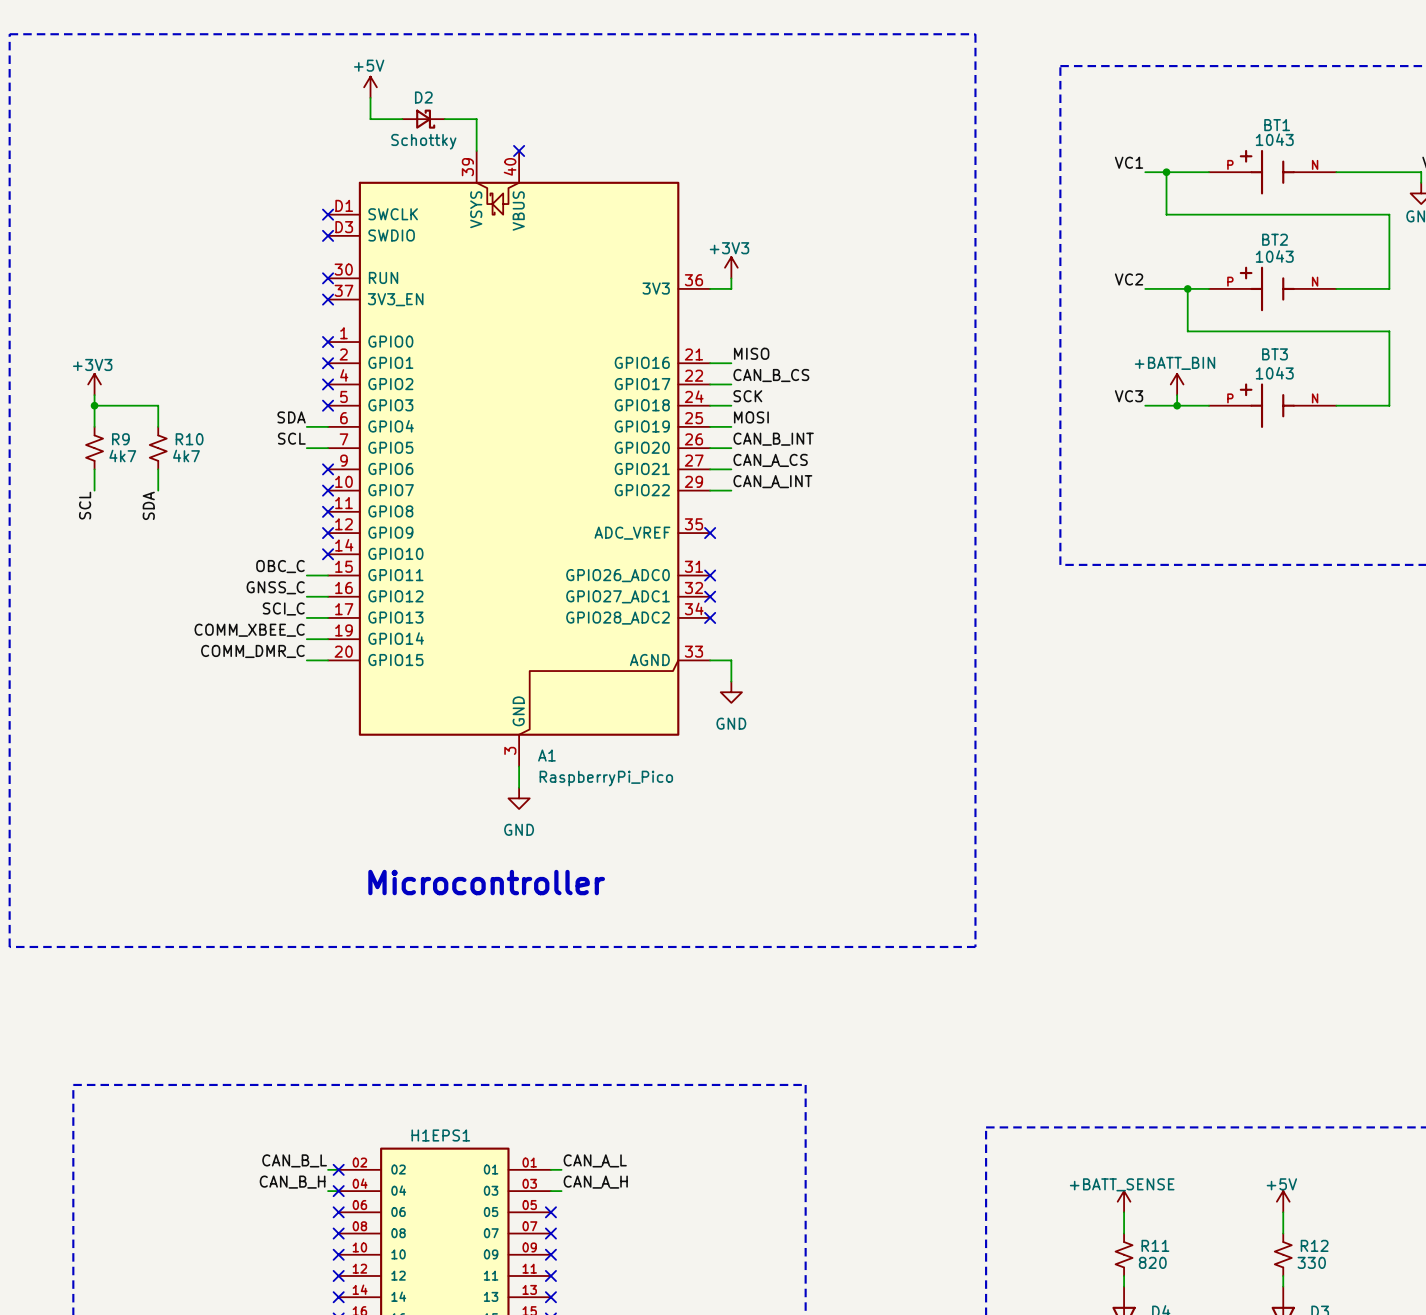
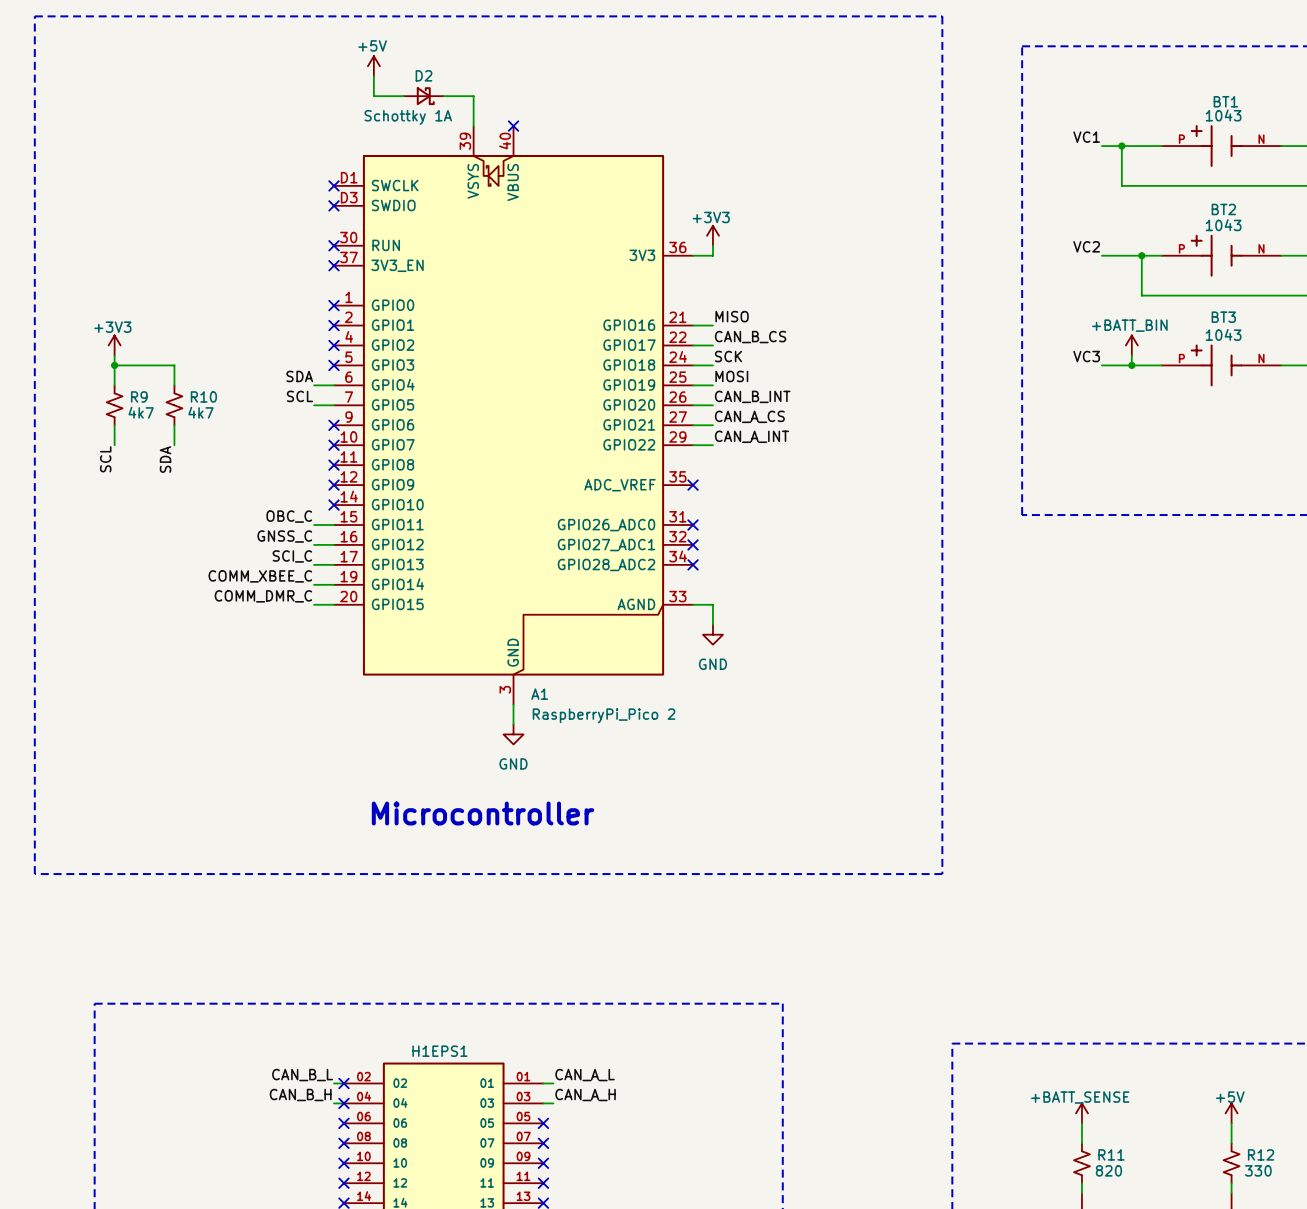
D2 value: Schottky (423, 141) -> Schottky 1A (408, 117)
A1 value: RaspberryPi_Pico (606, 778) -> RaspberryPi_Pico 2 (604, 715)

